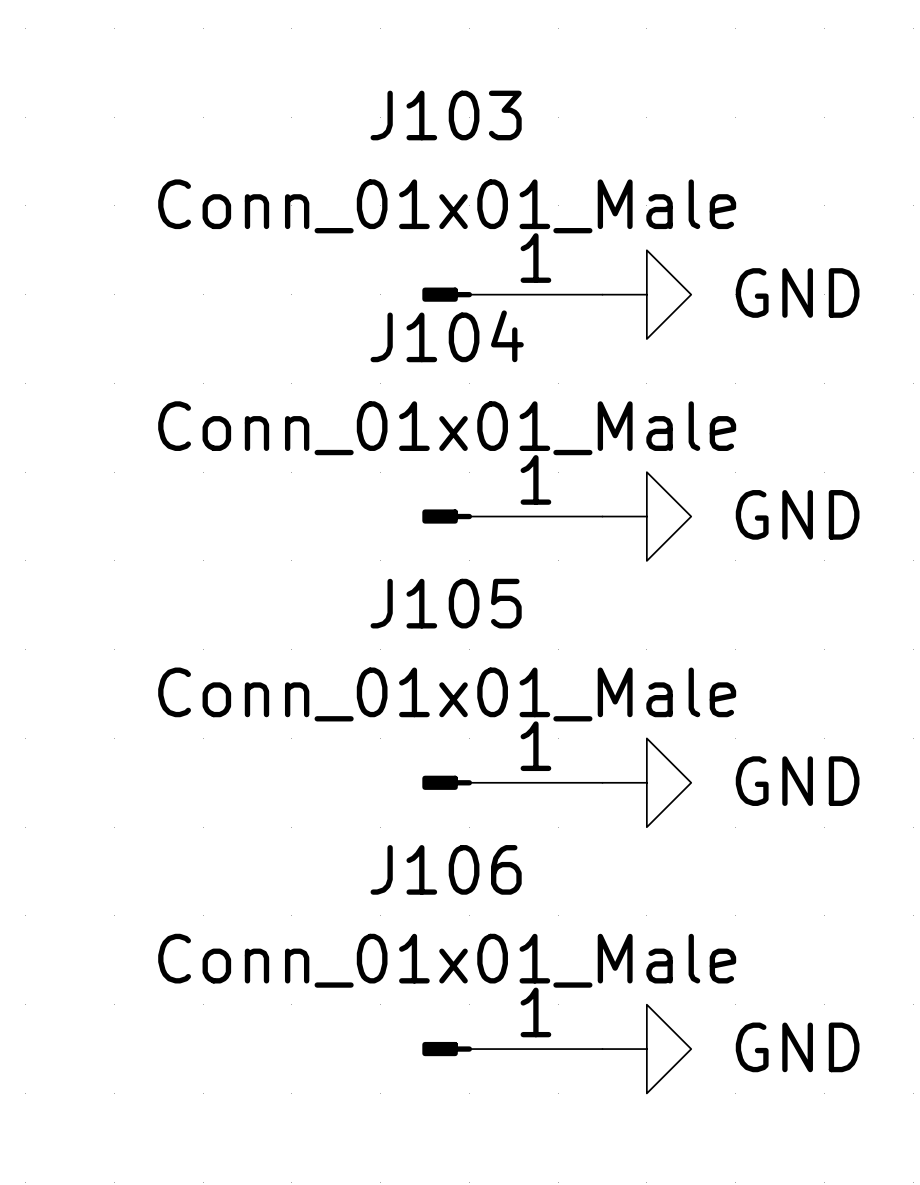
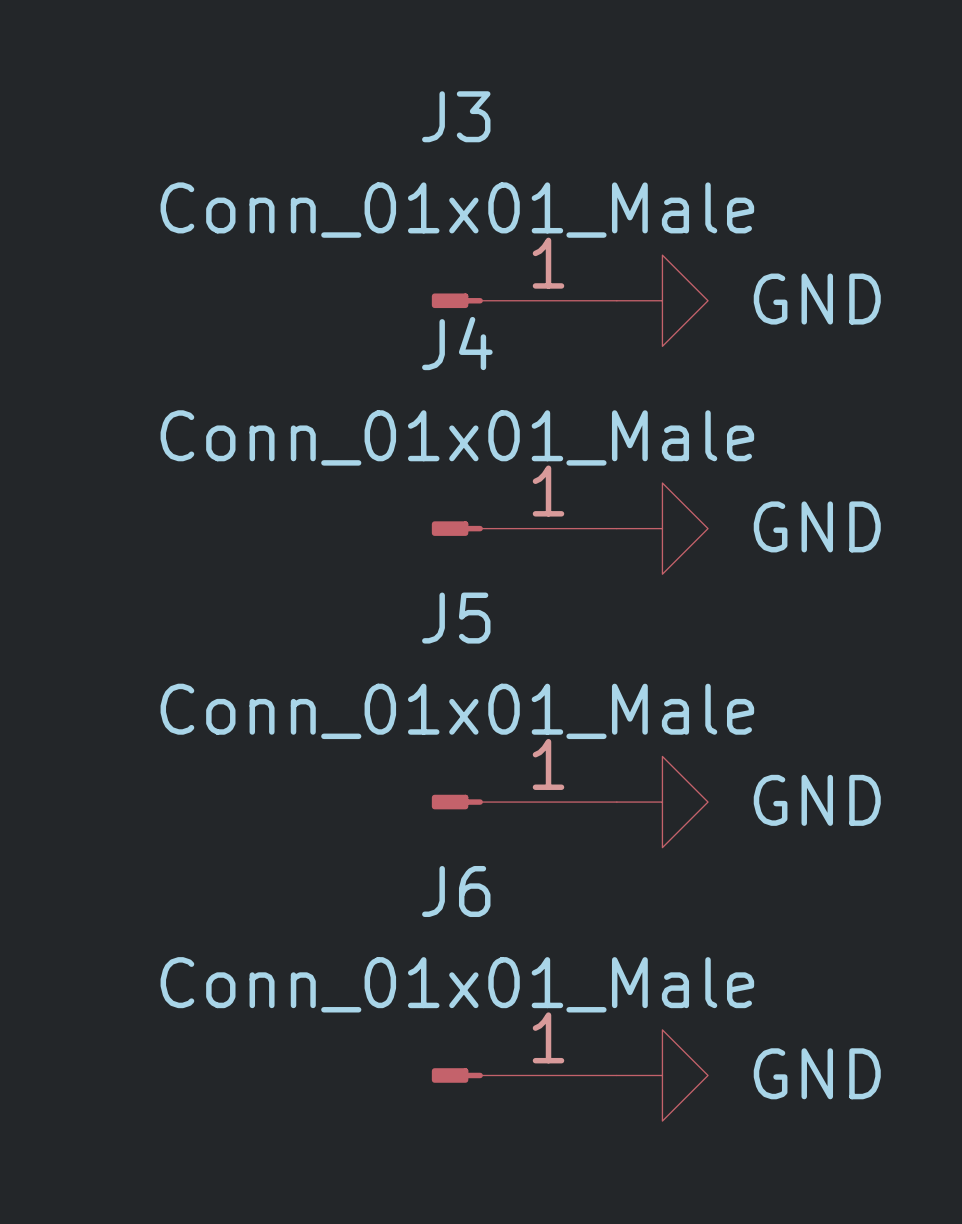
J103 name: J103 (446, 115) -> J3 (456, 116)
J104 name: J104 (447, 336) -> J4 (457, 343)
J105 name: J105 (446, 603) -> J5 (456, 618)
J106 name: J106 (446, 869) -> J6 (456, 891)

